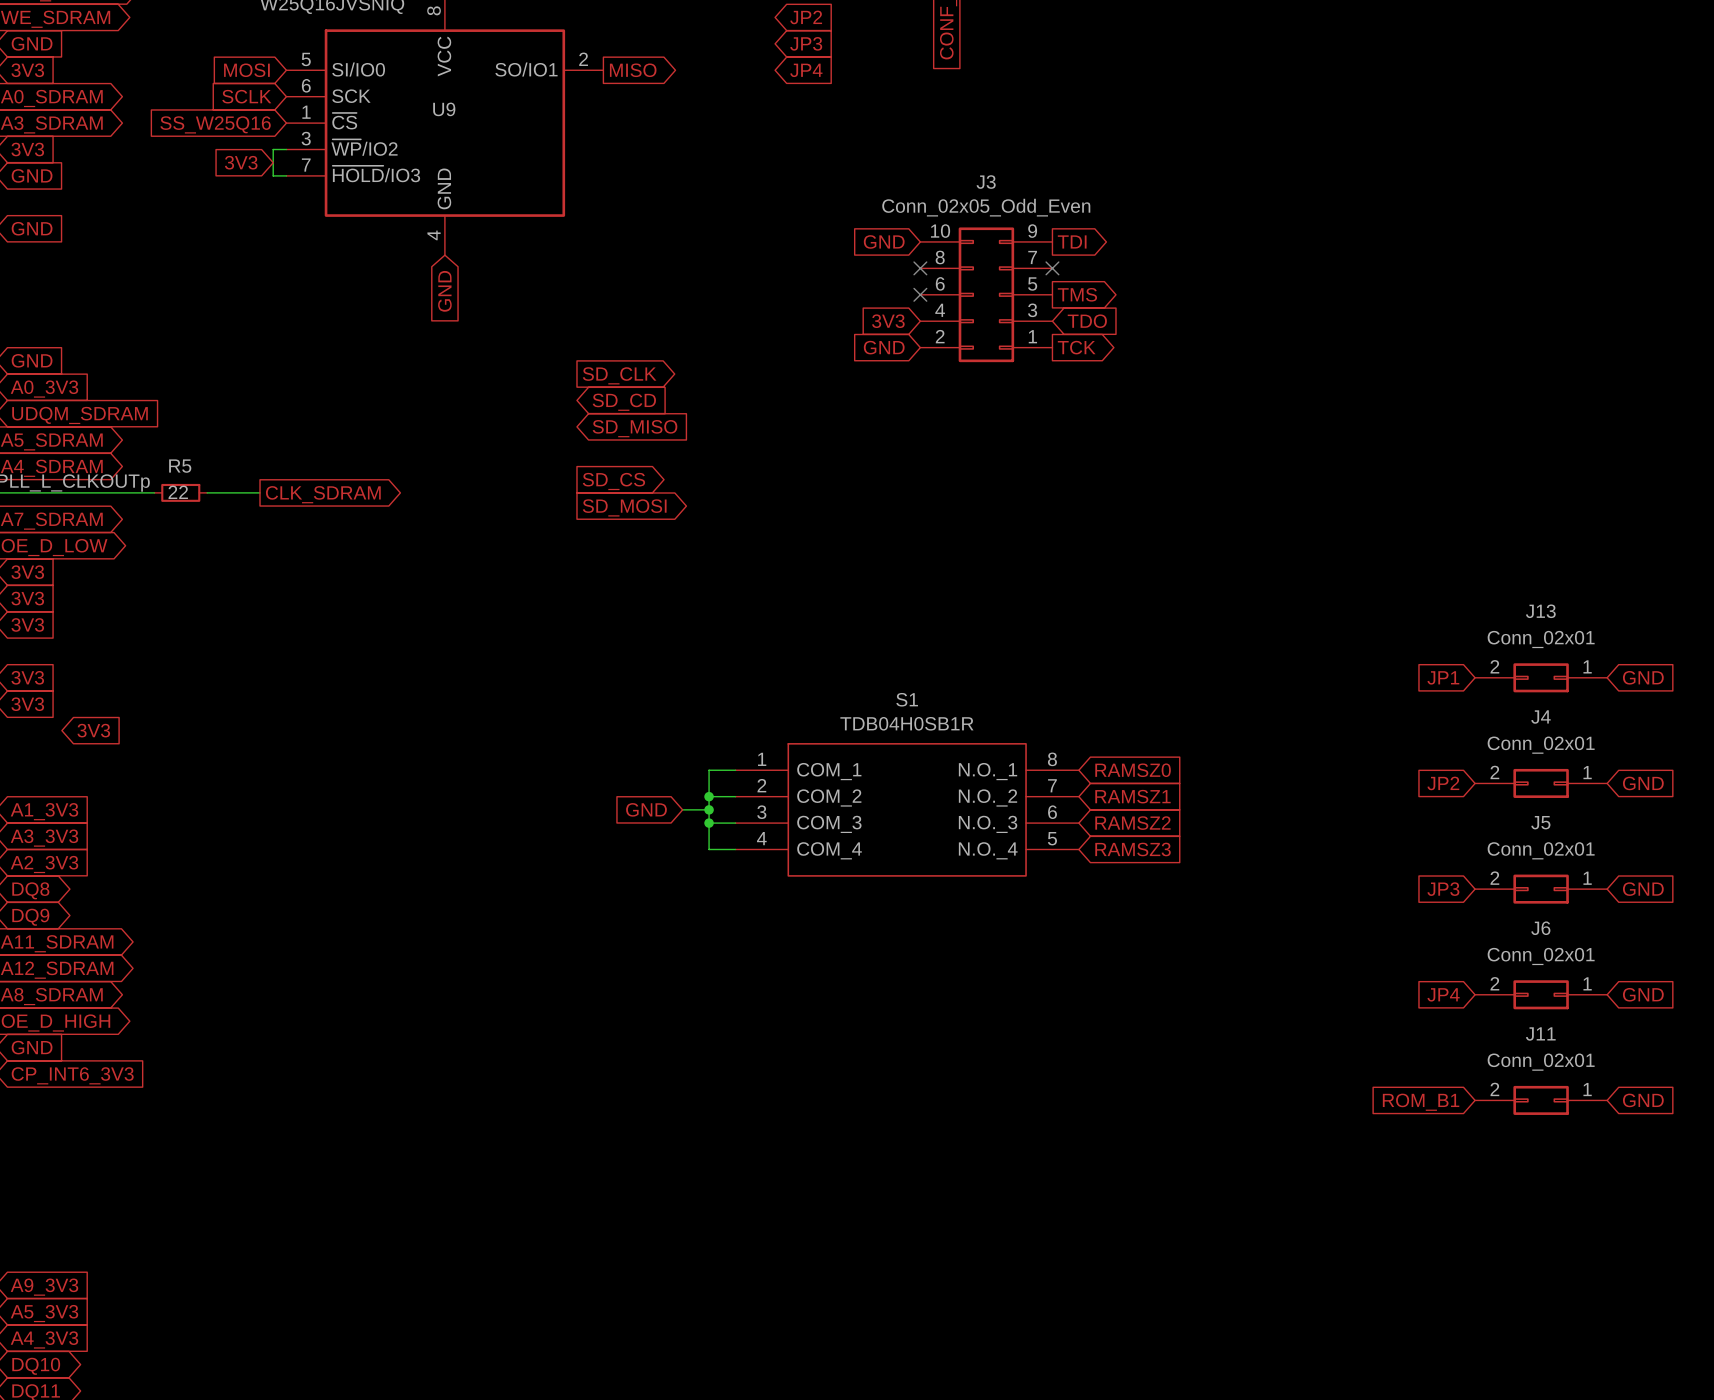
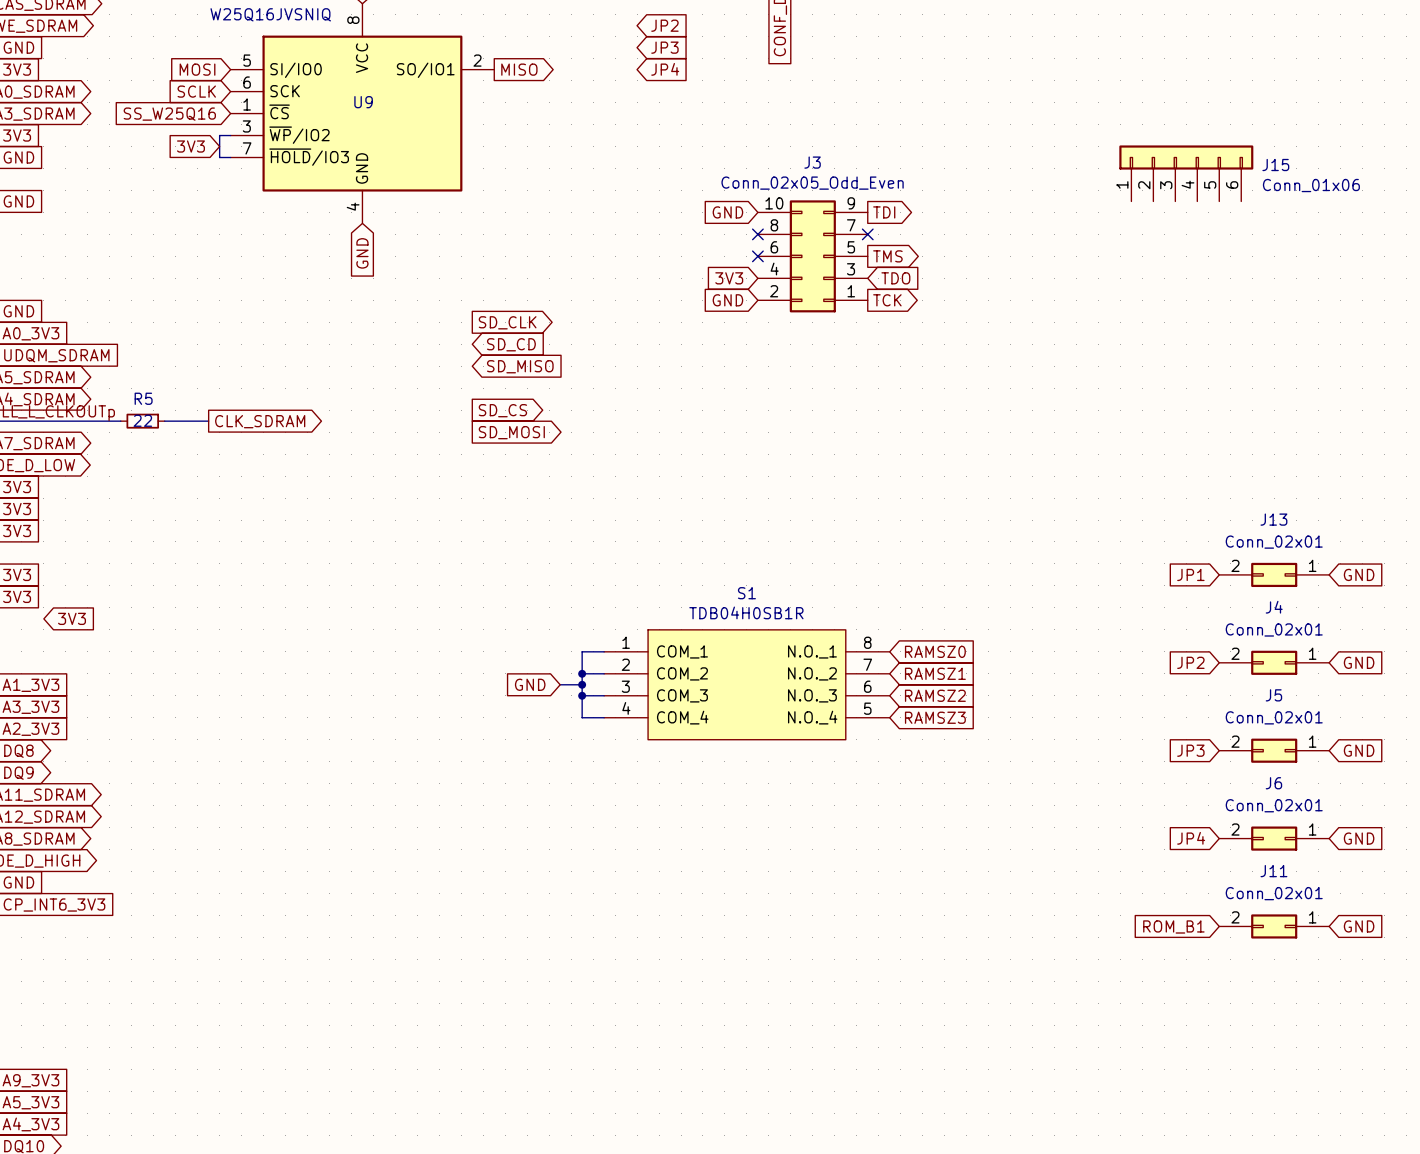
J15: none -> Conn_01x06 (1186, 173)

